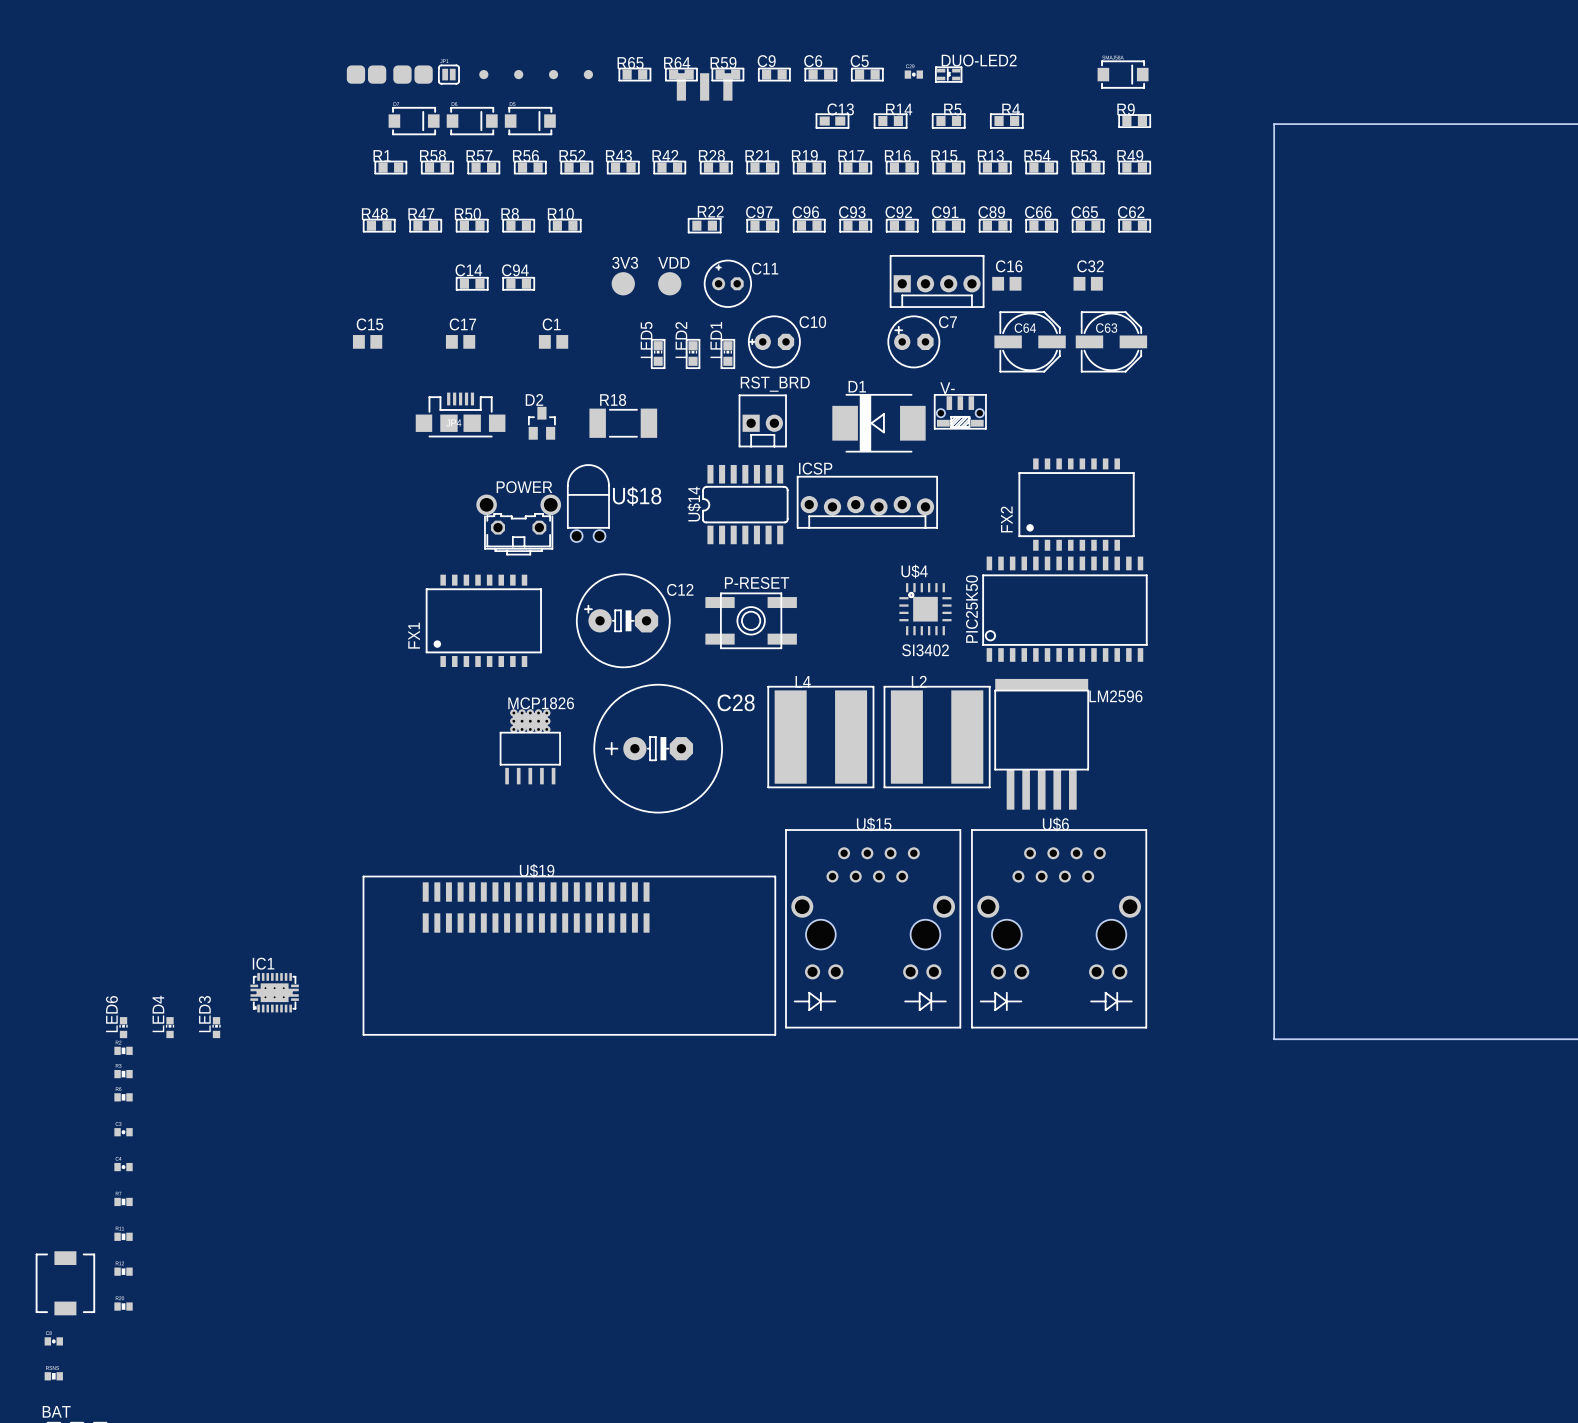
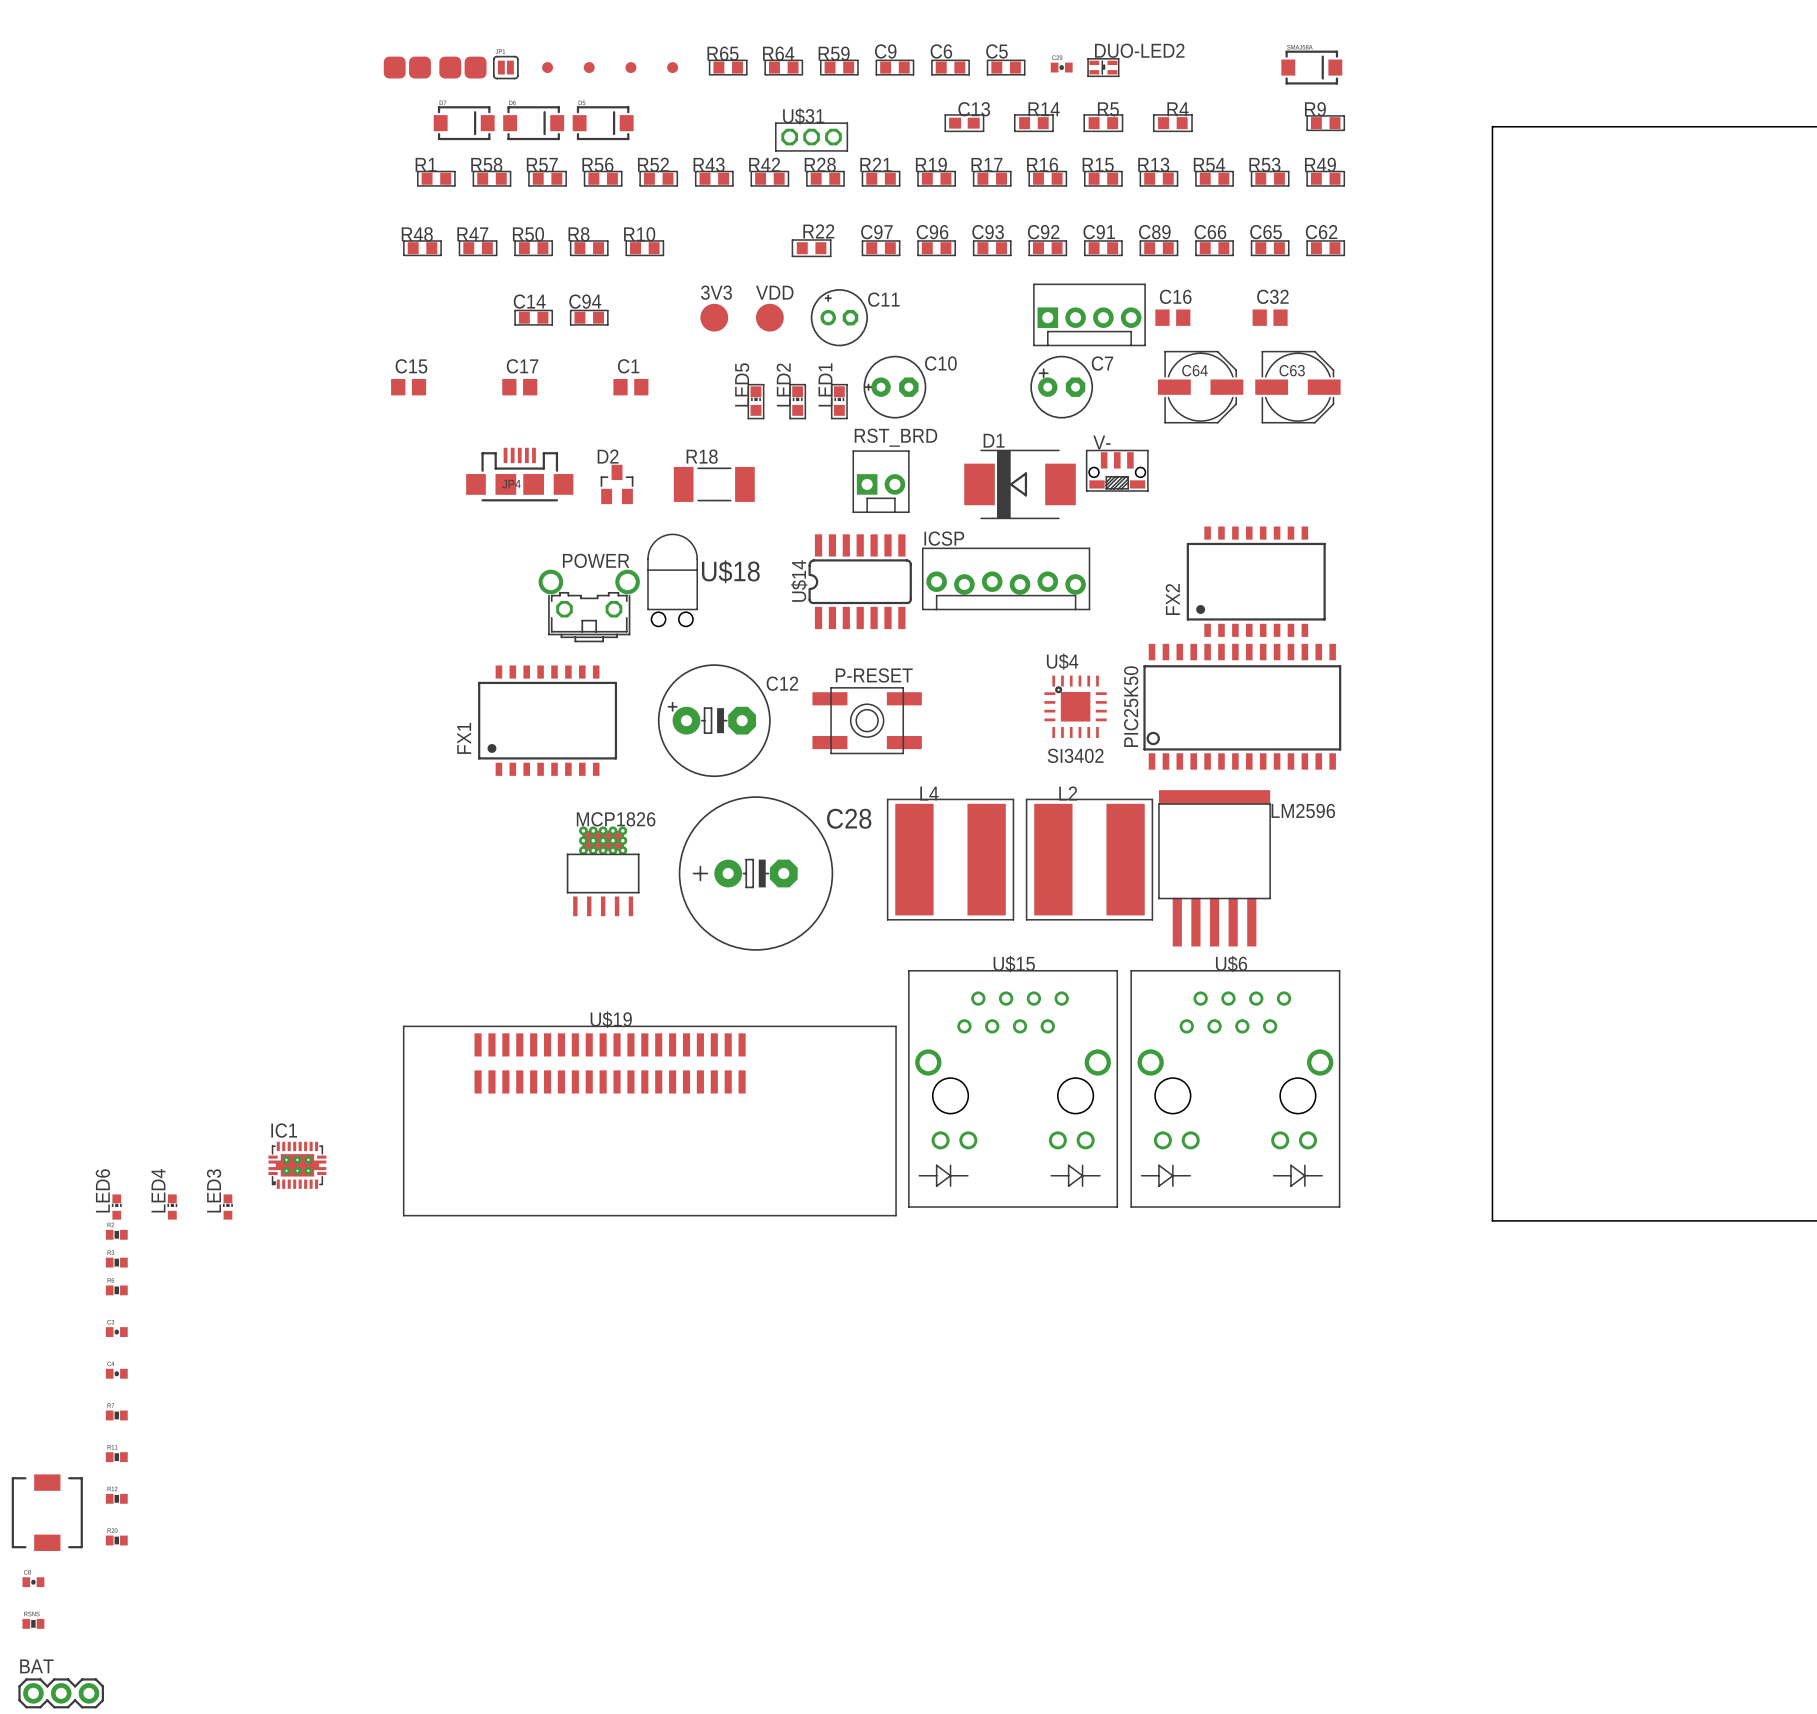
part: (704, 86) -> none
U$31: none -> (811, 137)

